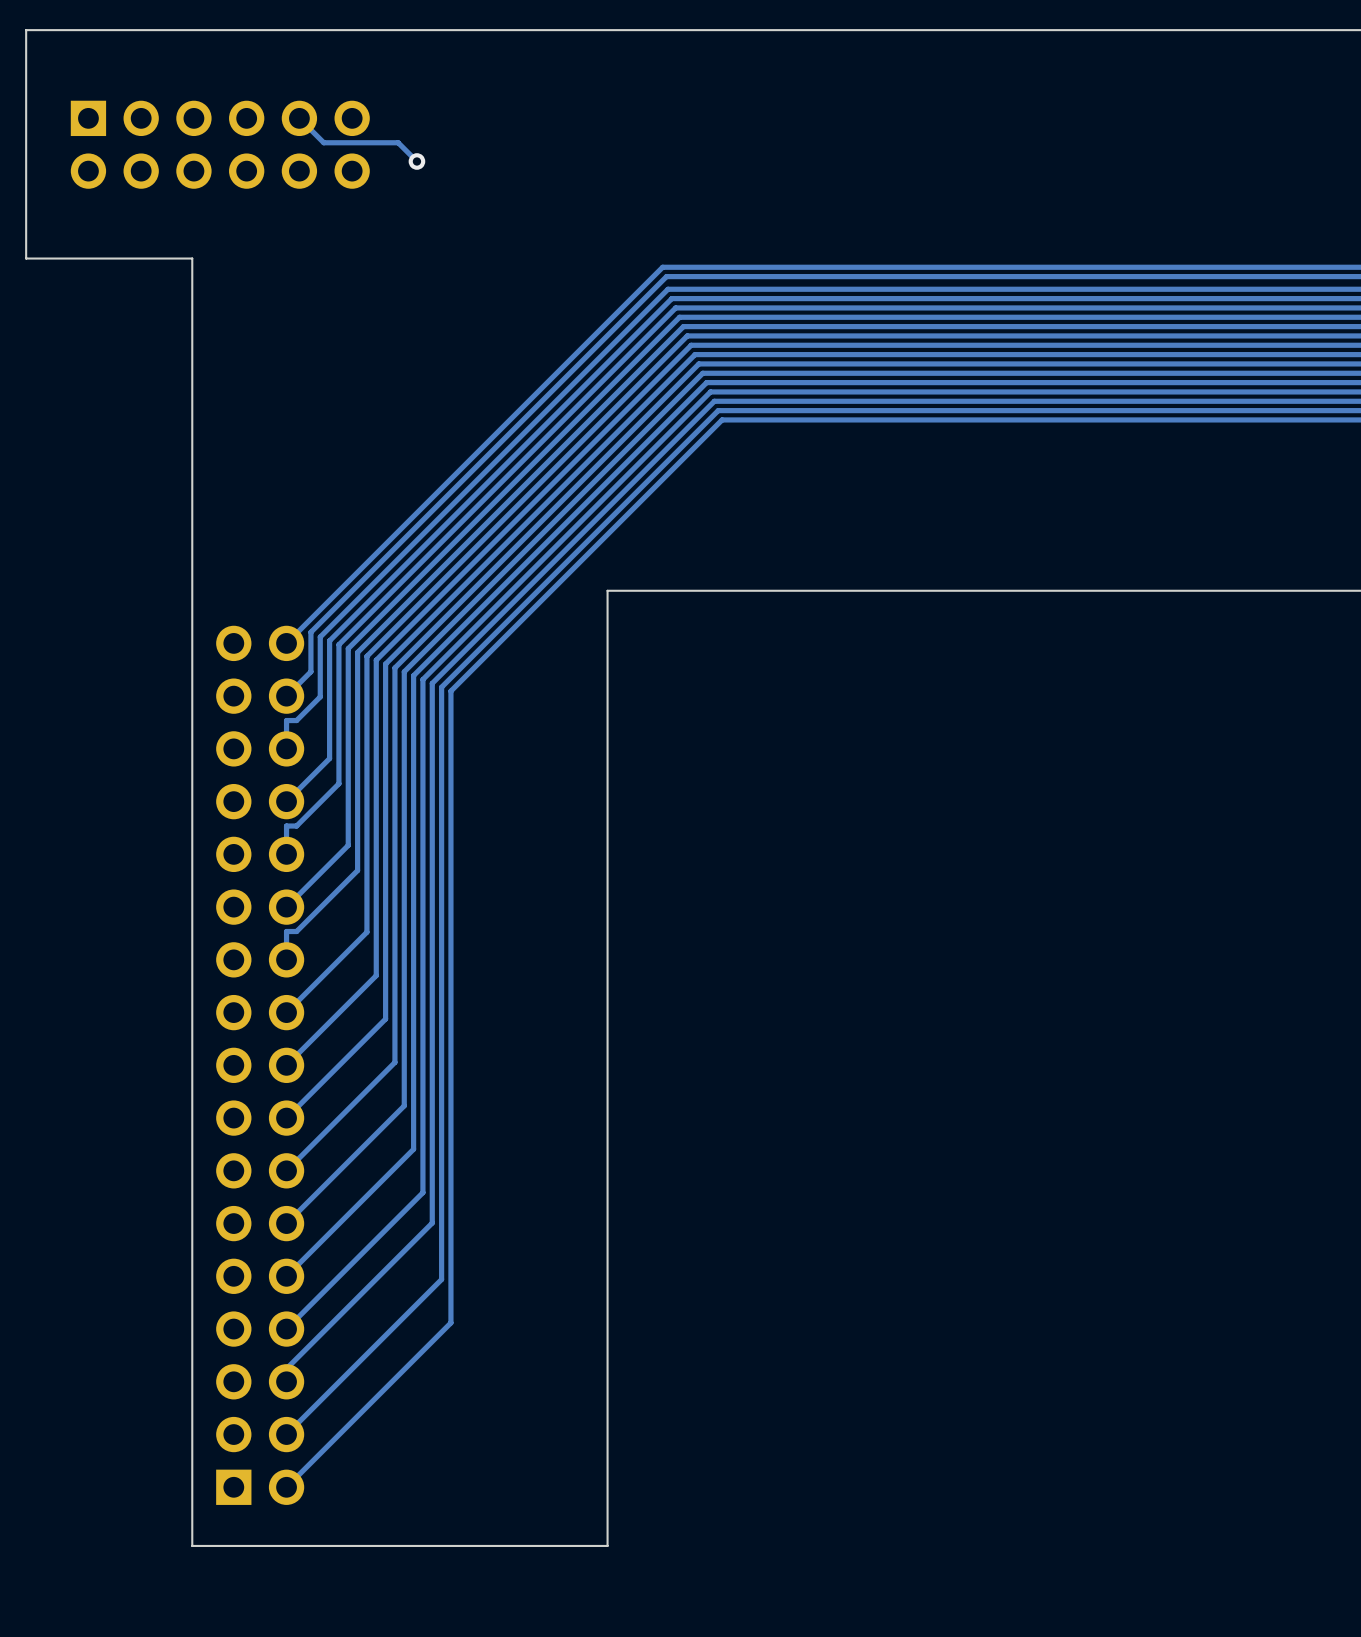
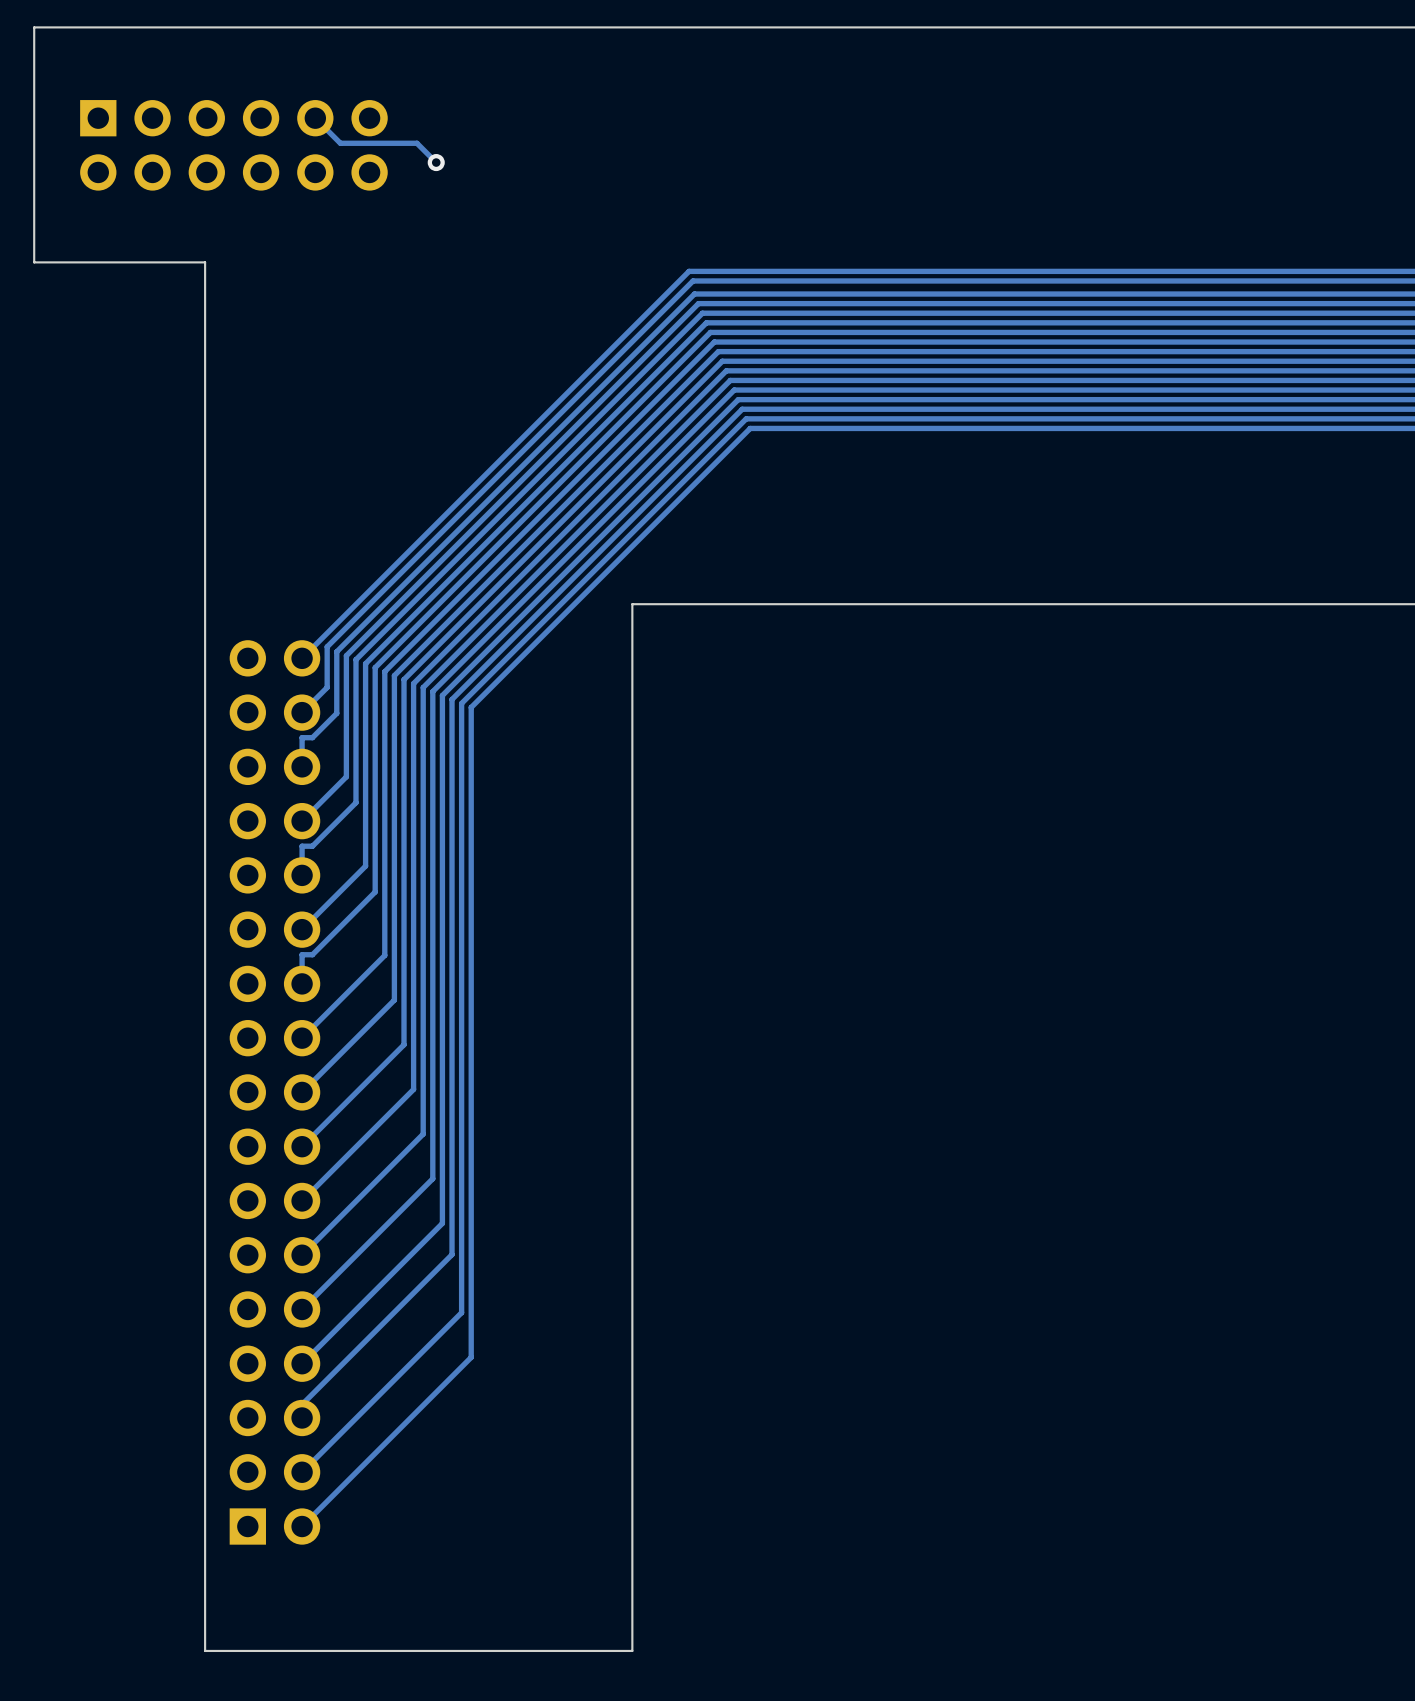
board edge: (607, 1545) (192, 1545) -> (632, 1586) (632, 1650) (205, 1650) (205, 1586)

